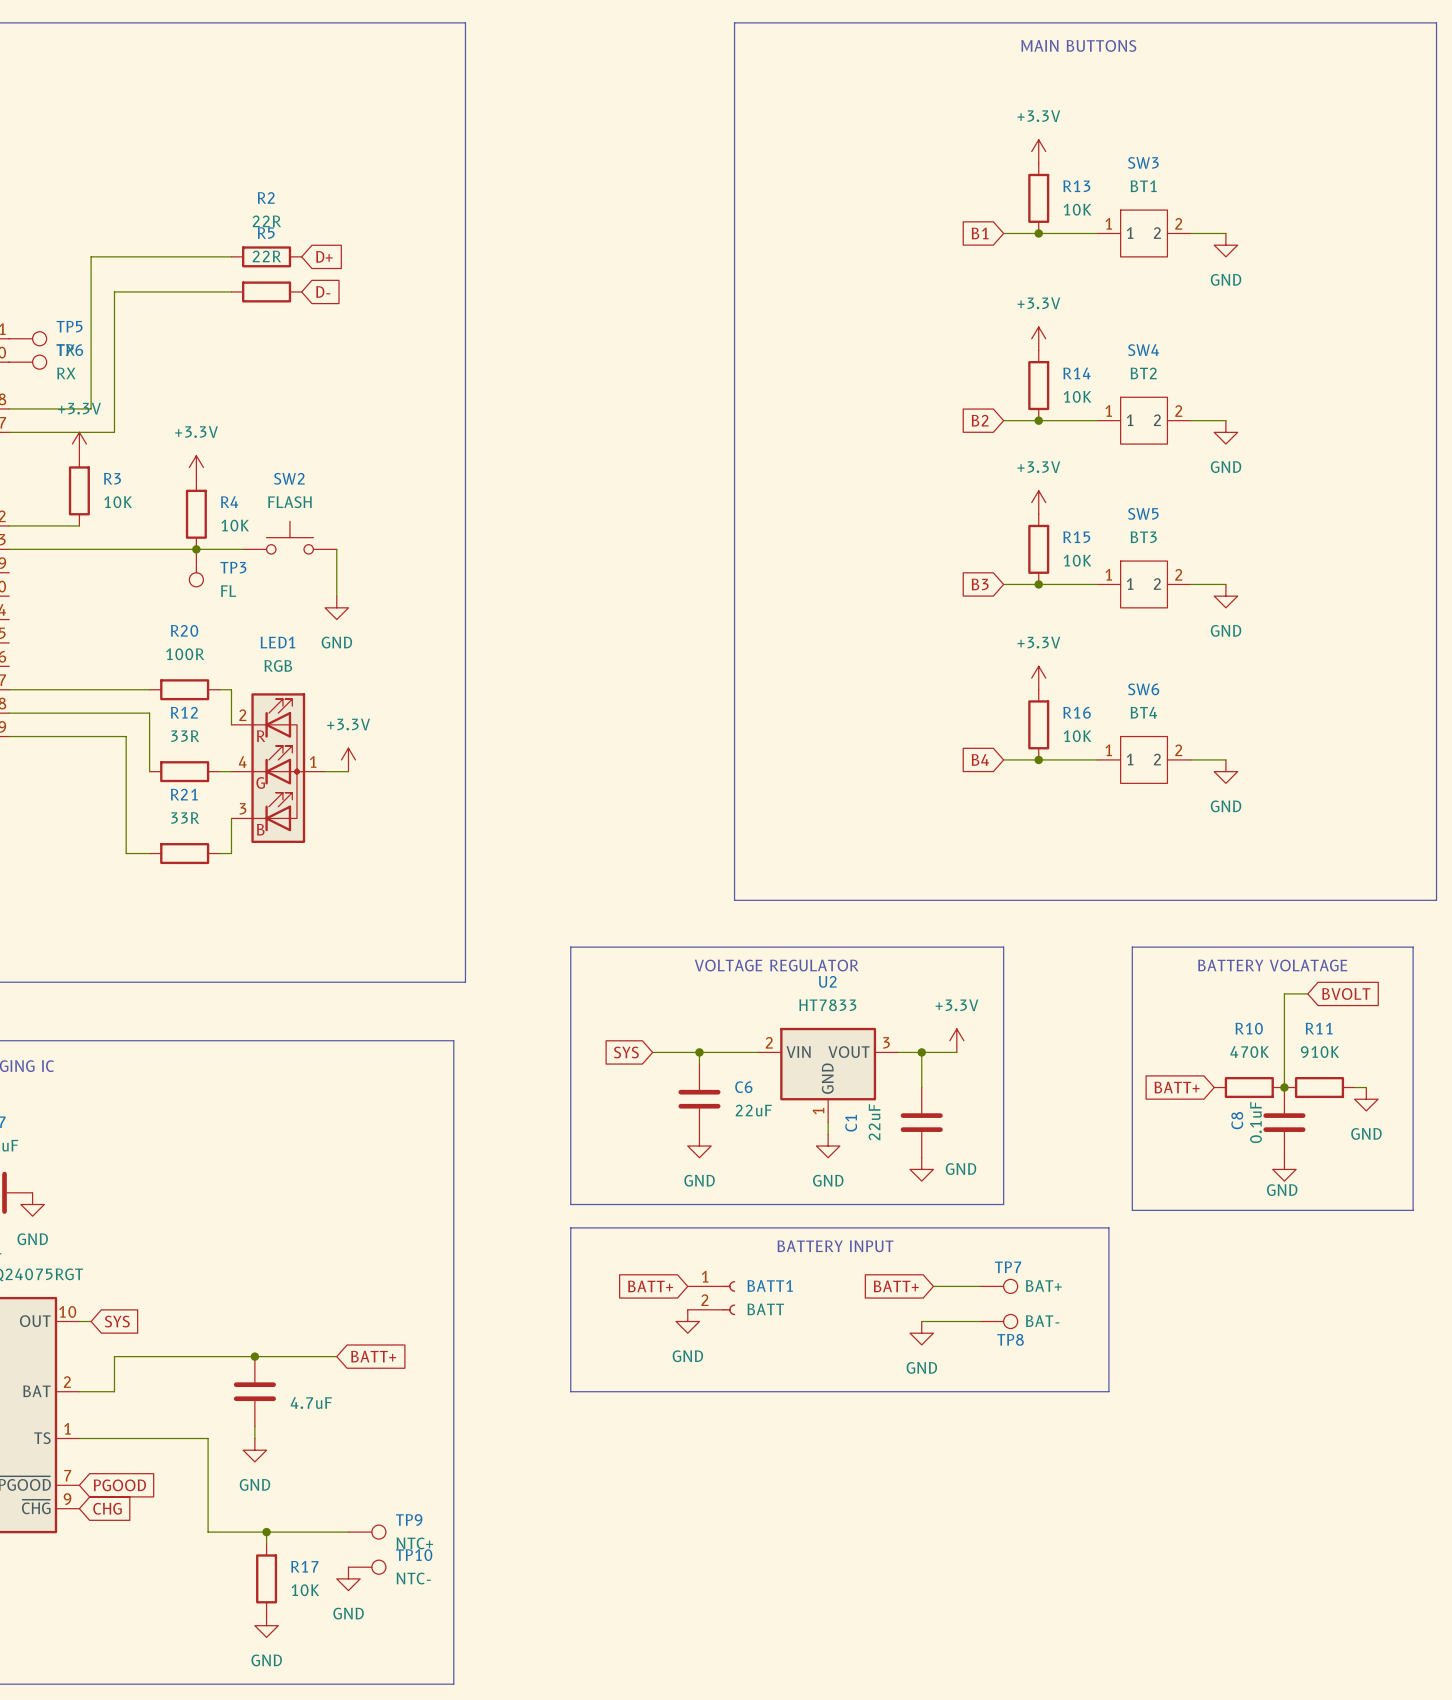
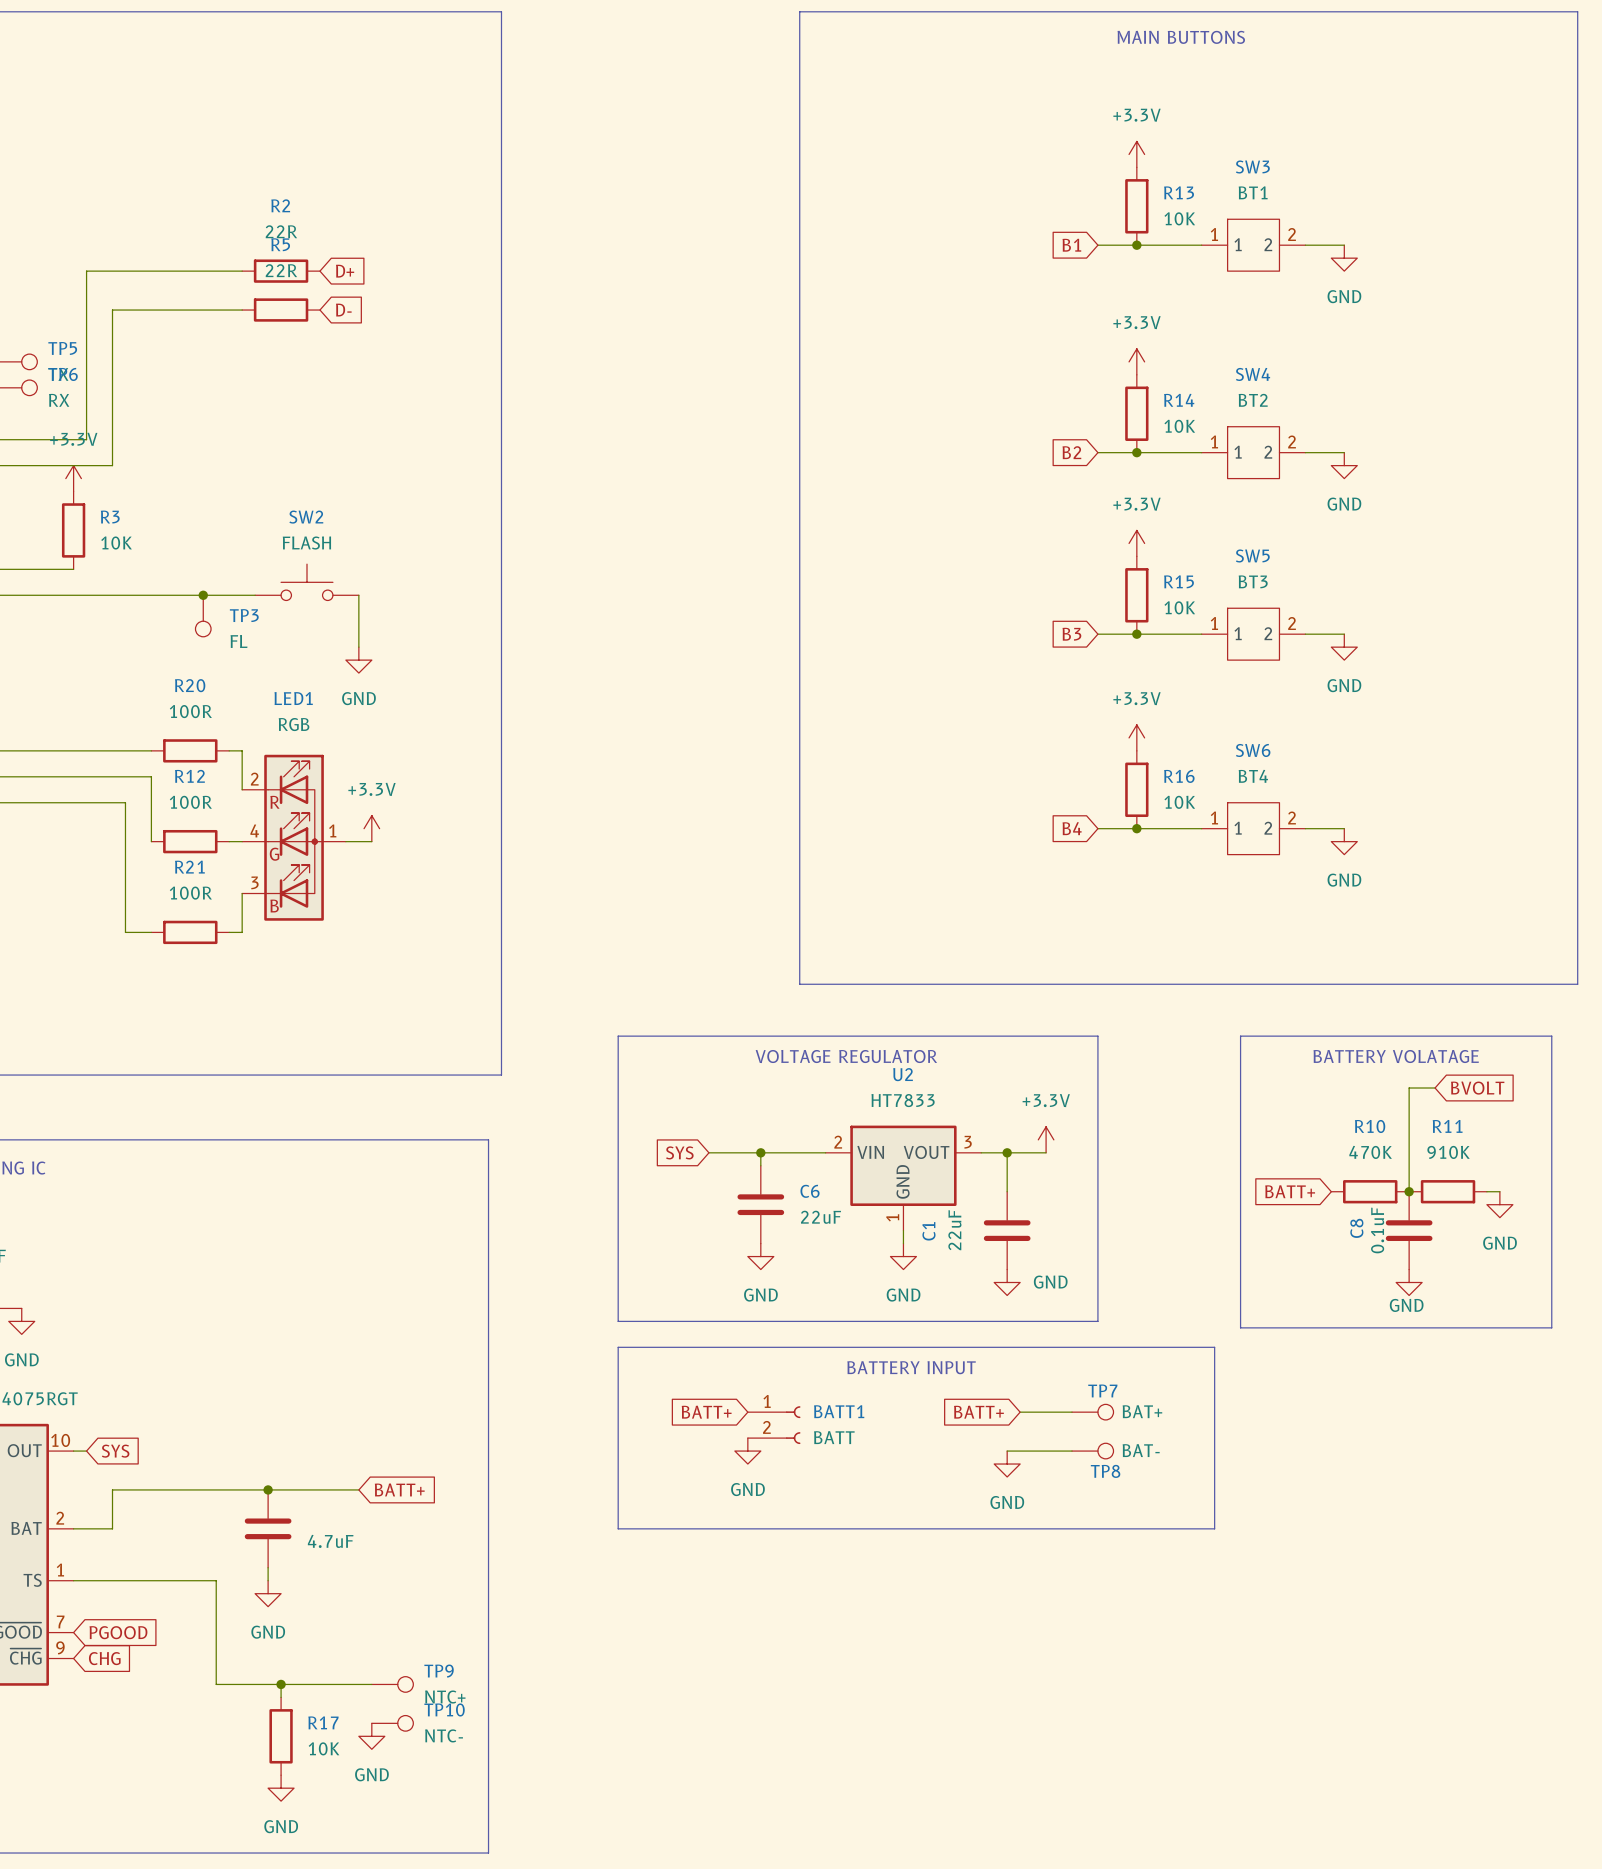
power symbol: +3.3V (196, 467) -> none
R4: 10K (196, 514) -> none
R12 value: 33R (185, 736) -> 100R (190, 802)
R21 value: 33R (185, 818) -> 100R (190, 893)

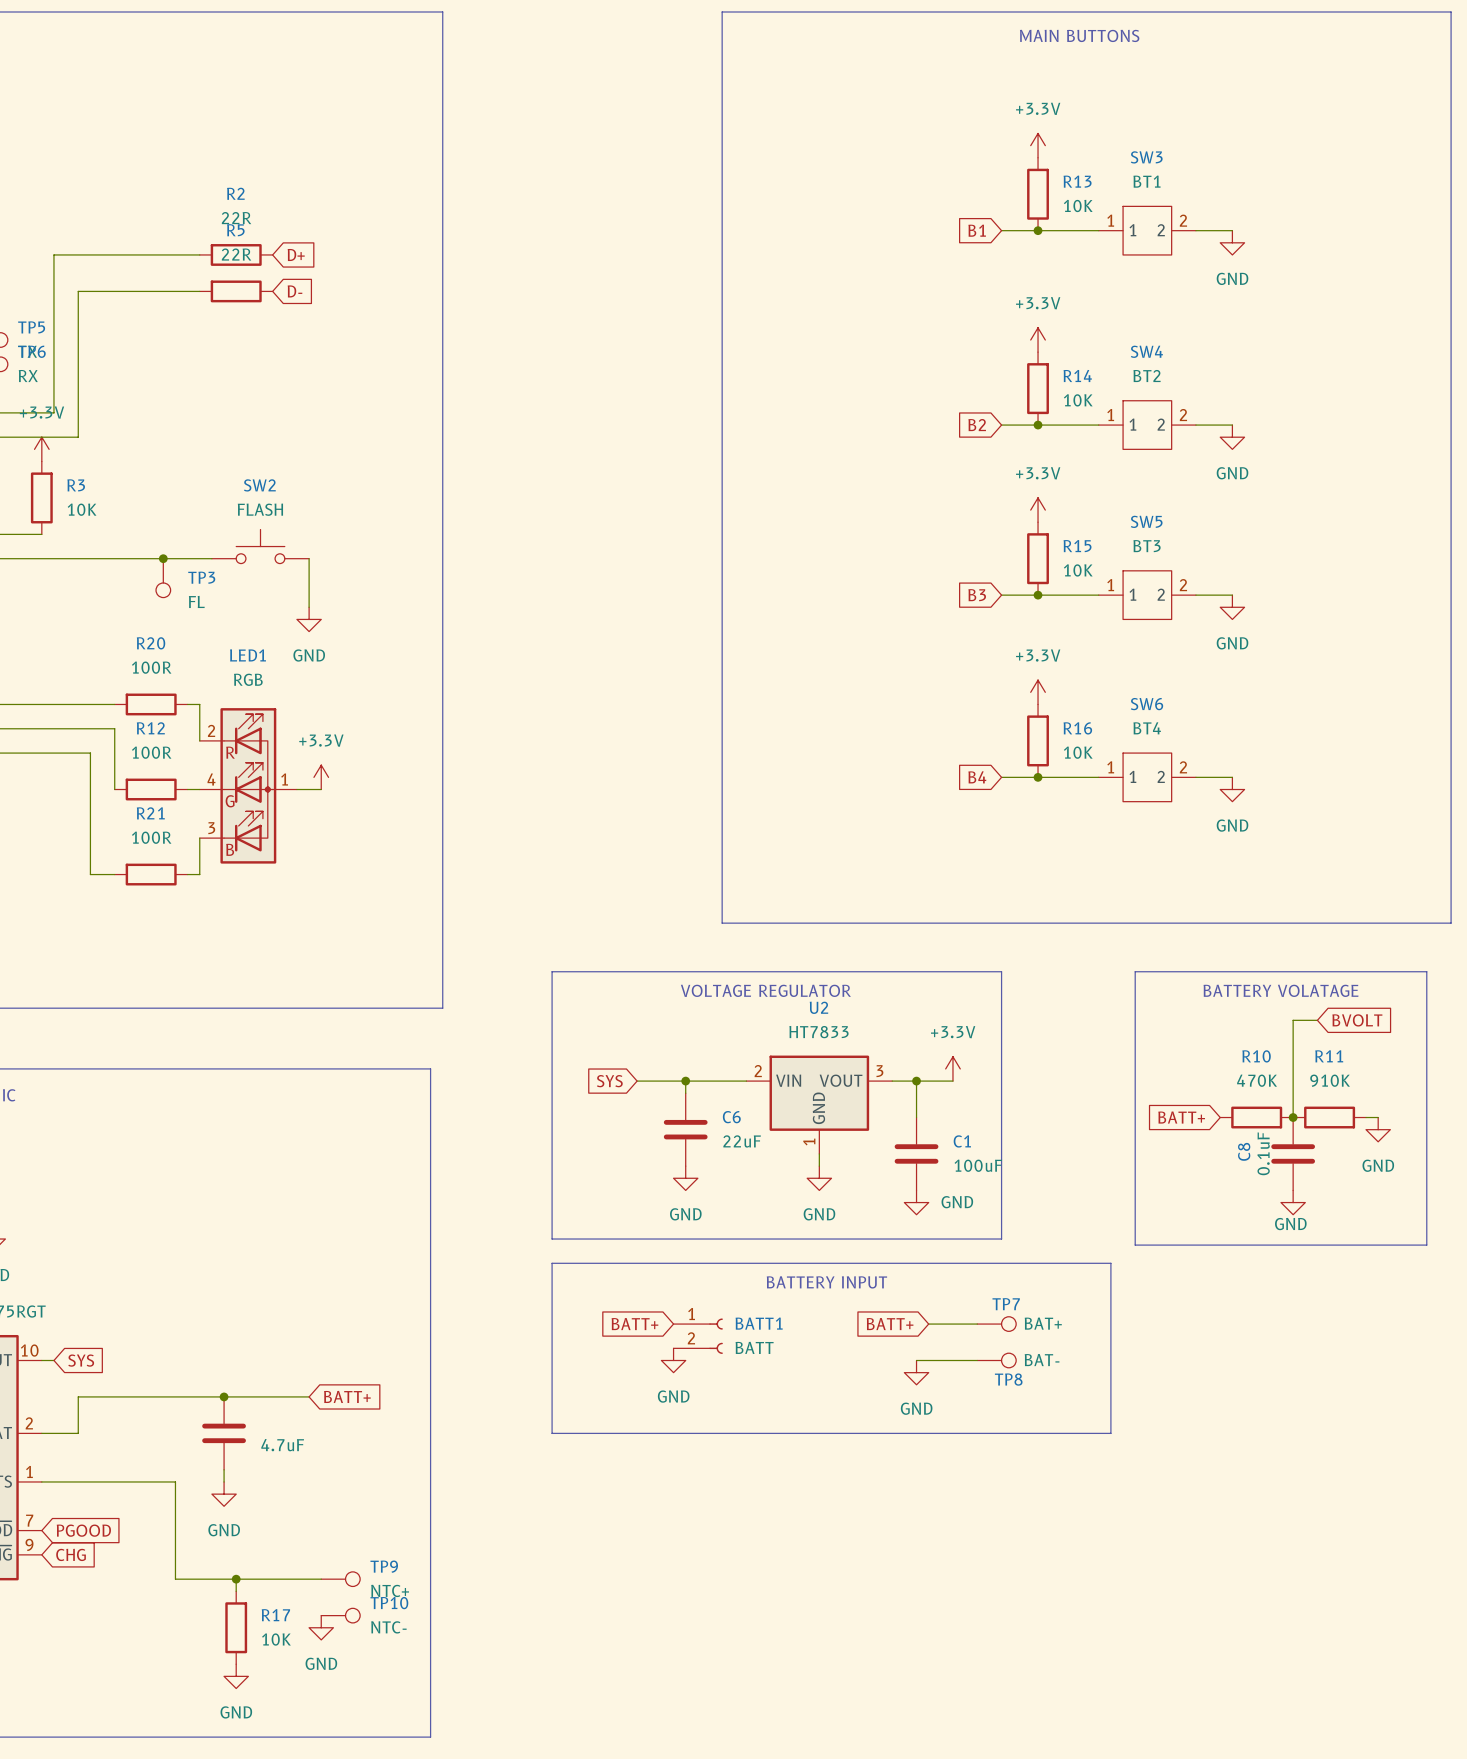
C1 value: 22uF (954, 1230) -> 100uF (978, 1165)
C1 name rotation: 0° (928, 1231) -> 90° clockwise (962, 1141)
C1 name position: C1 (928, 1231) -> C1 (962, 1141)

